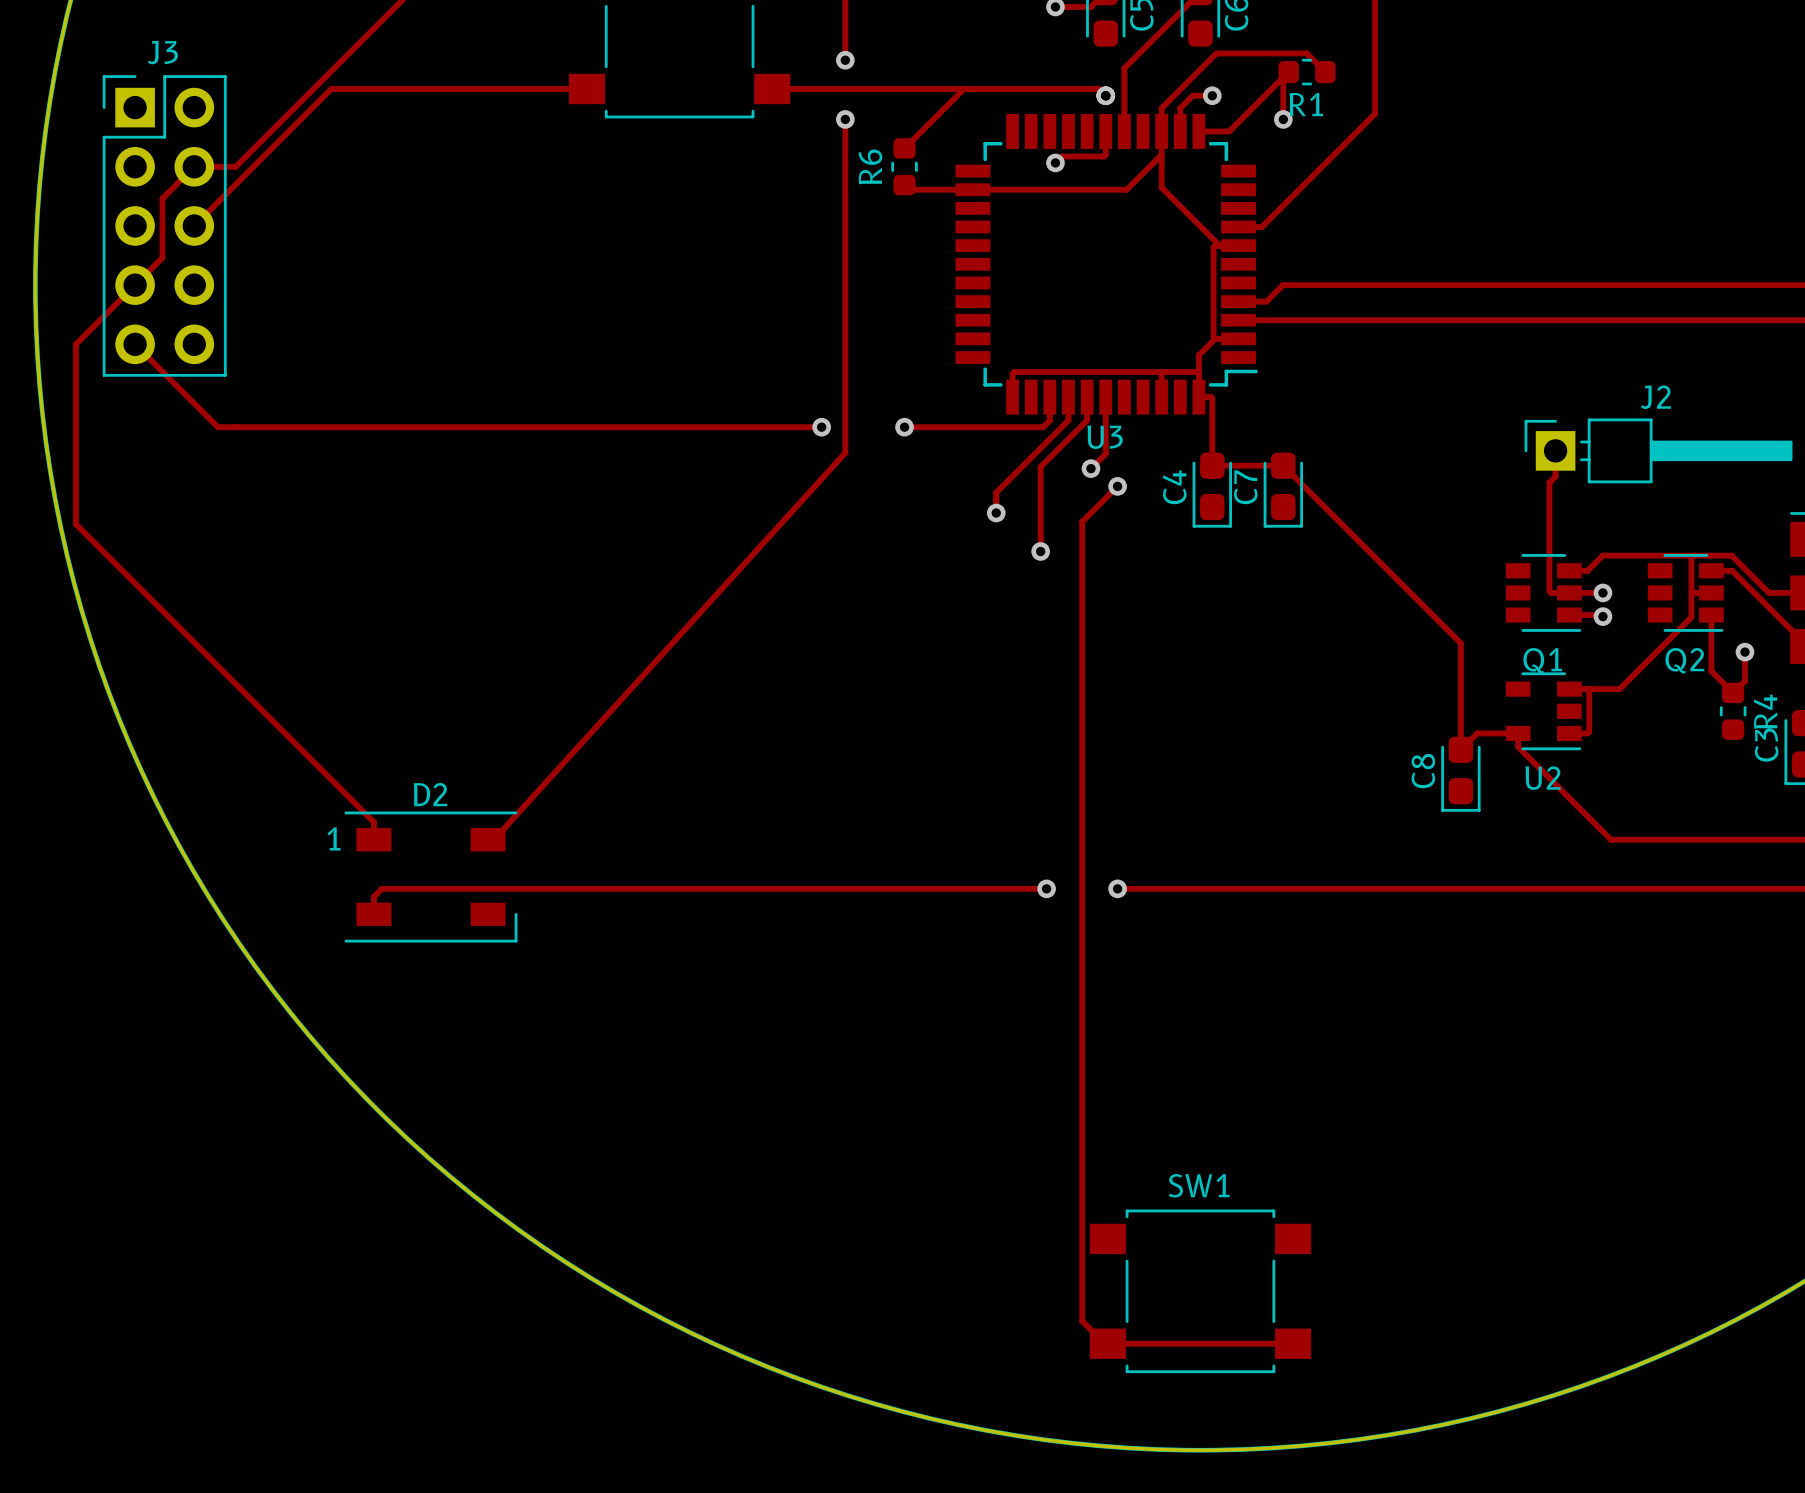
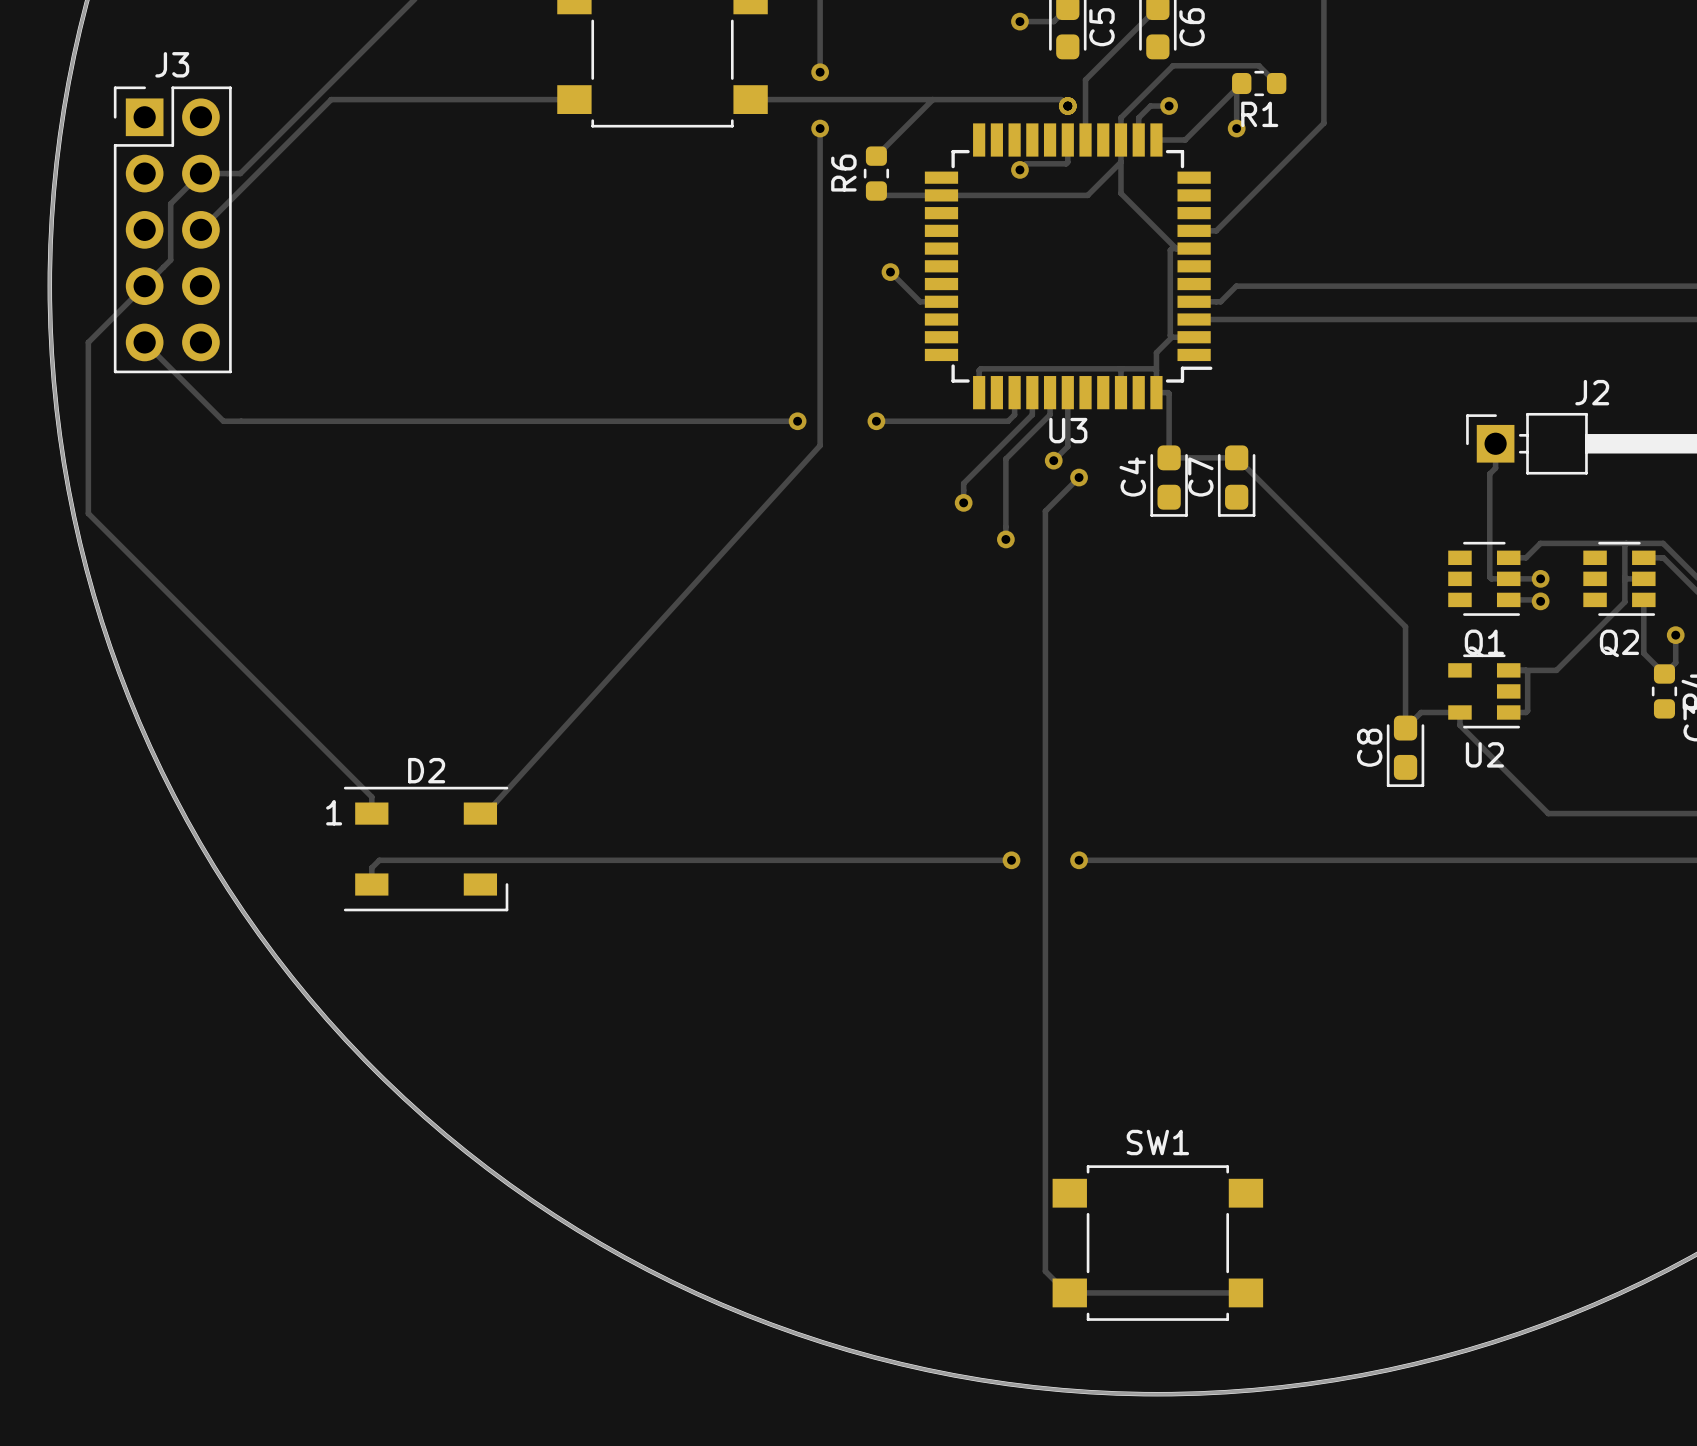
track: none -> (890, 272) (920, 301) (941, 301)
via: none -> (890, 272)

